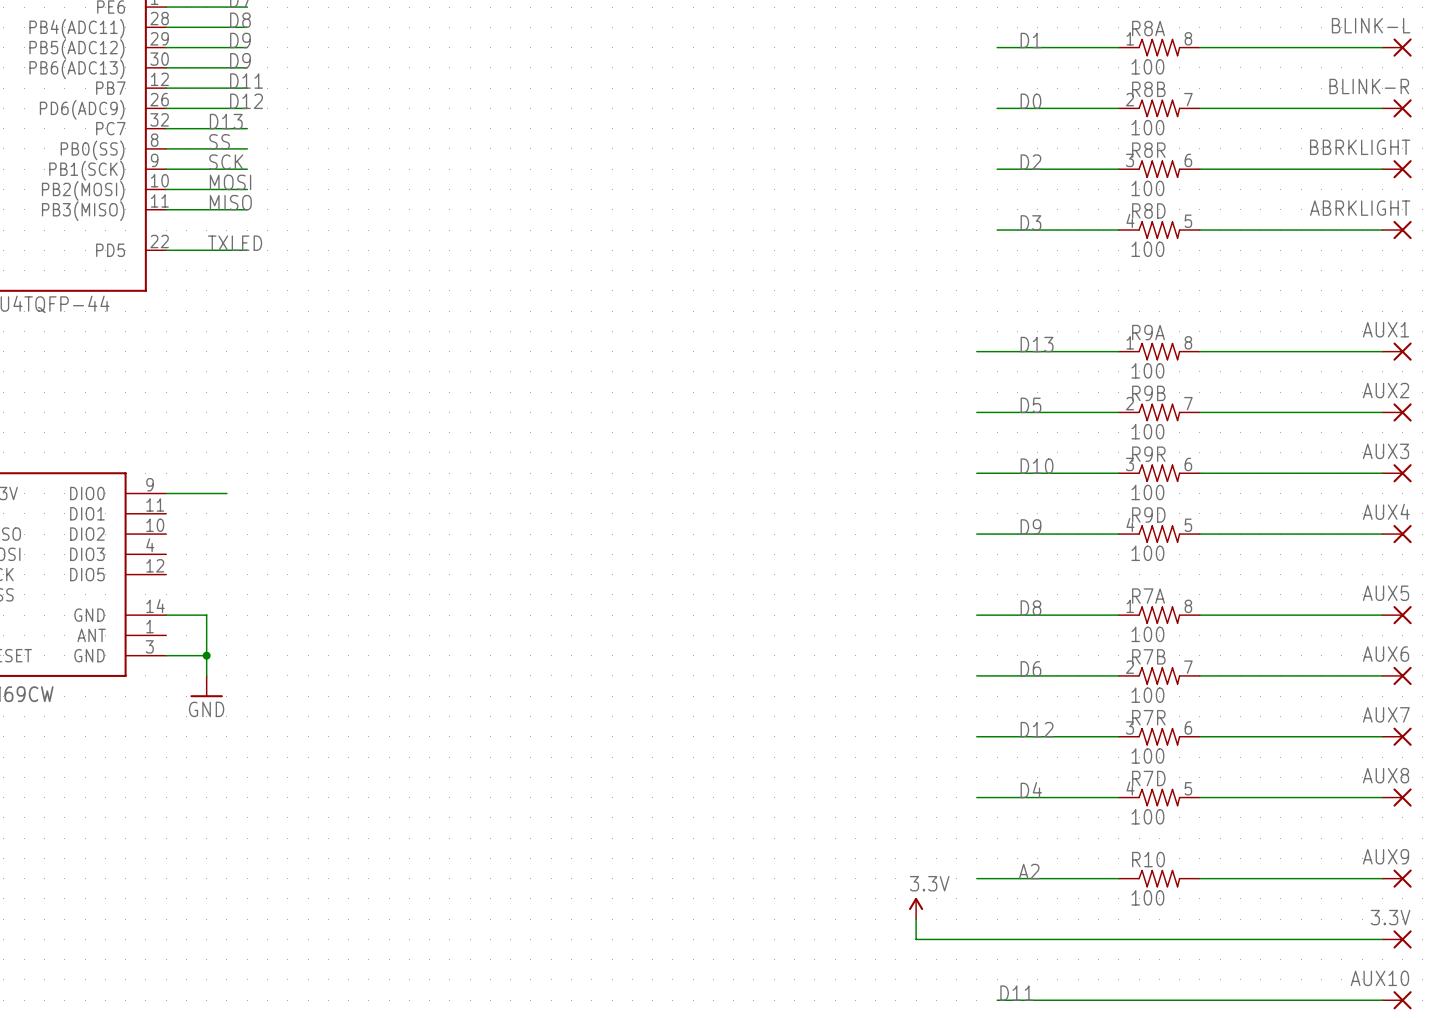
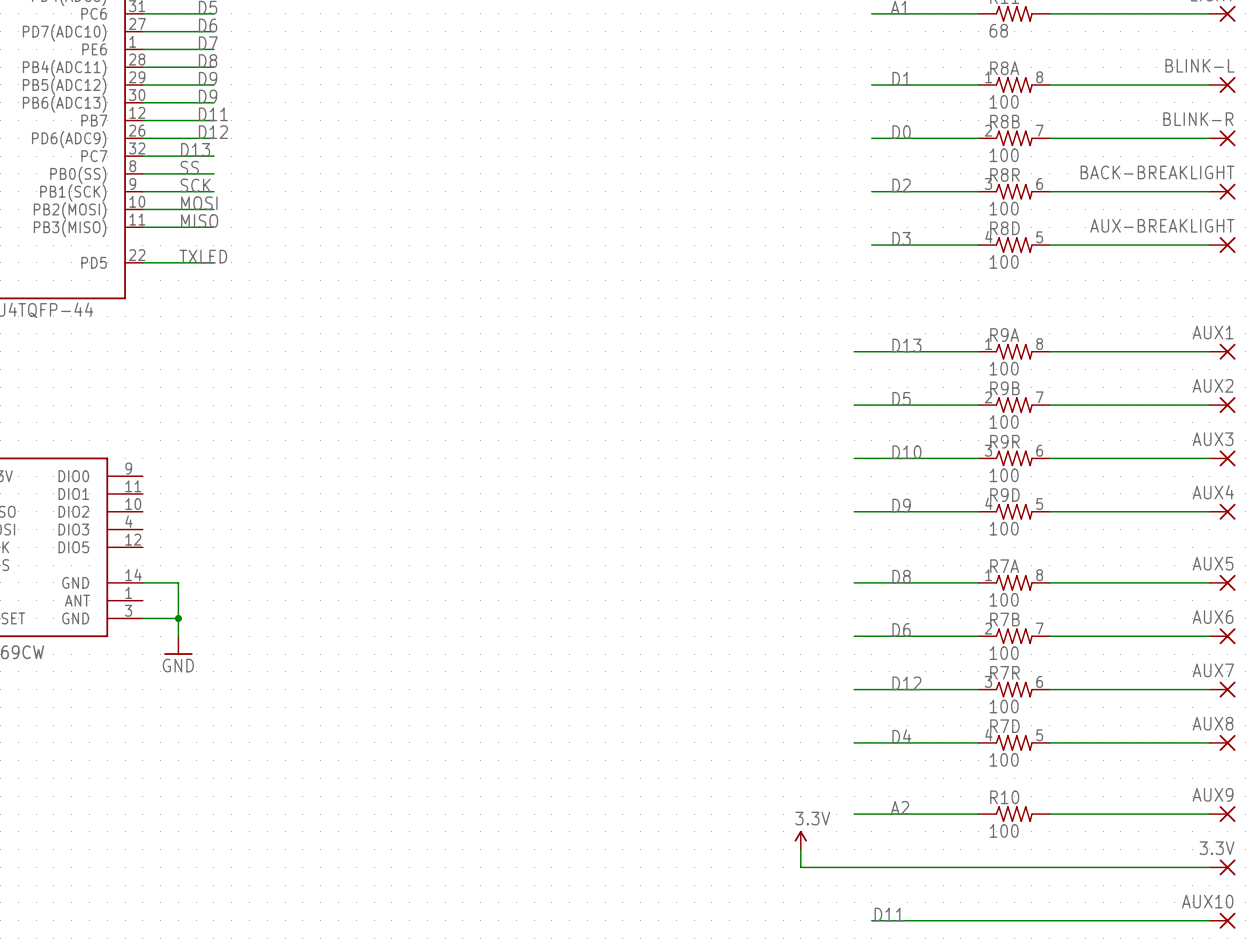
BBRKLIGHT name: BBRKLIGHT (1360, 147) -> BACK-BREAKLIGHT (1157, 172)
ABRKLIGHT name: ABRKLIGHT (1360, 208) -> AUX-BREAKLIGHT (1162, 225)
wire: (166, 493) (226, 493) -> none

